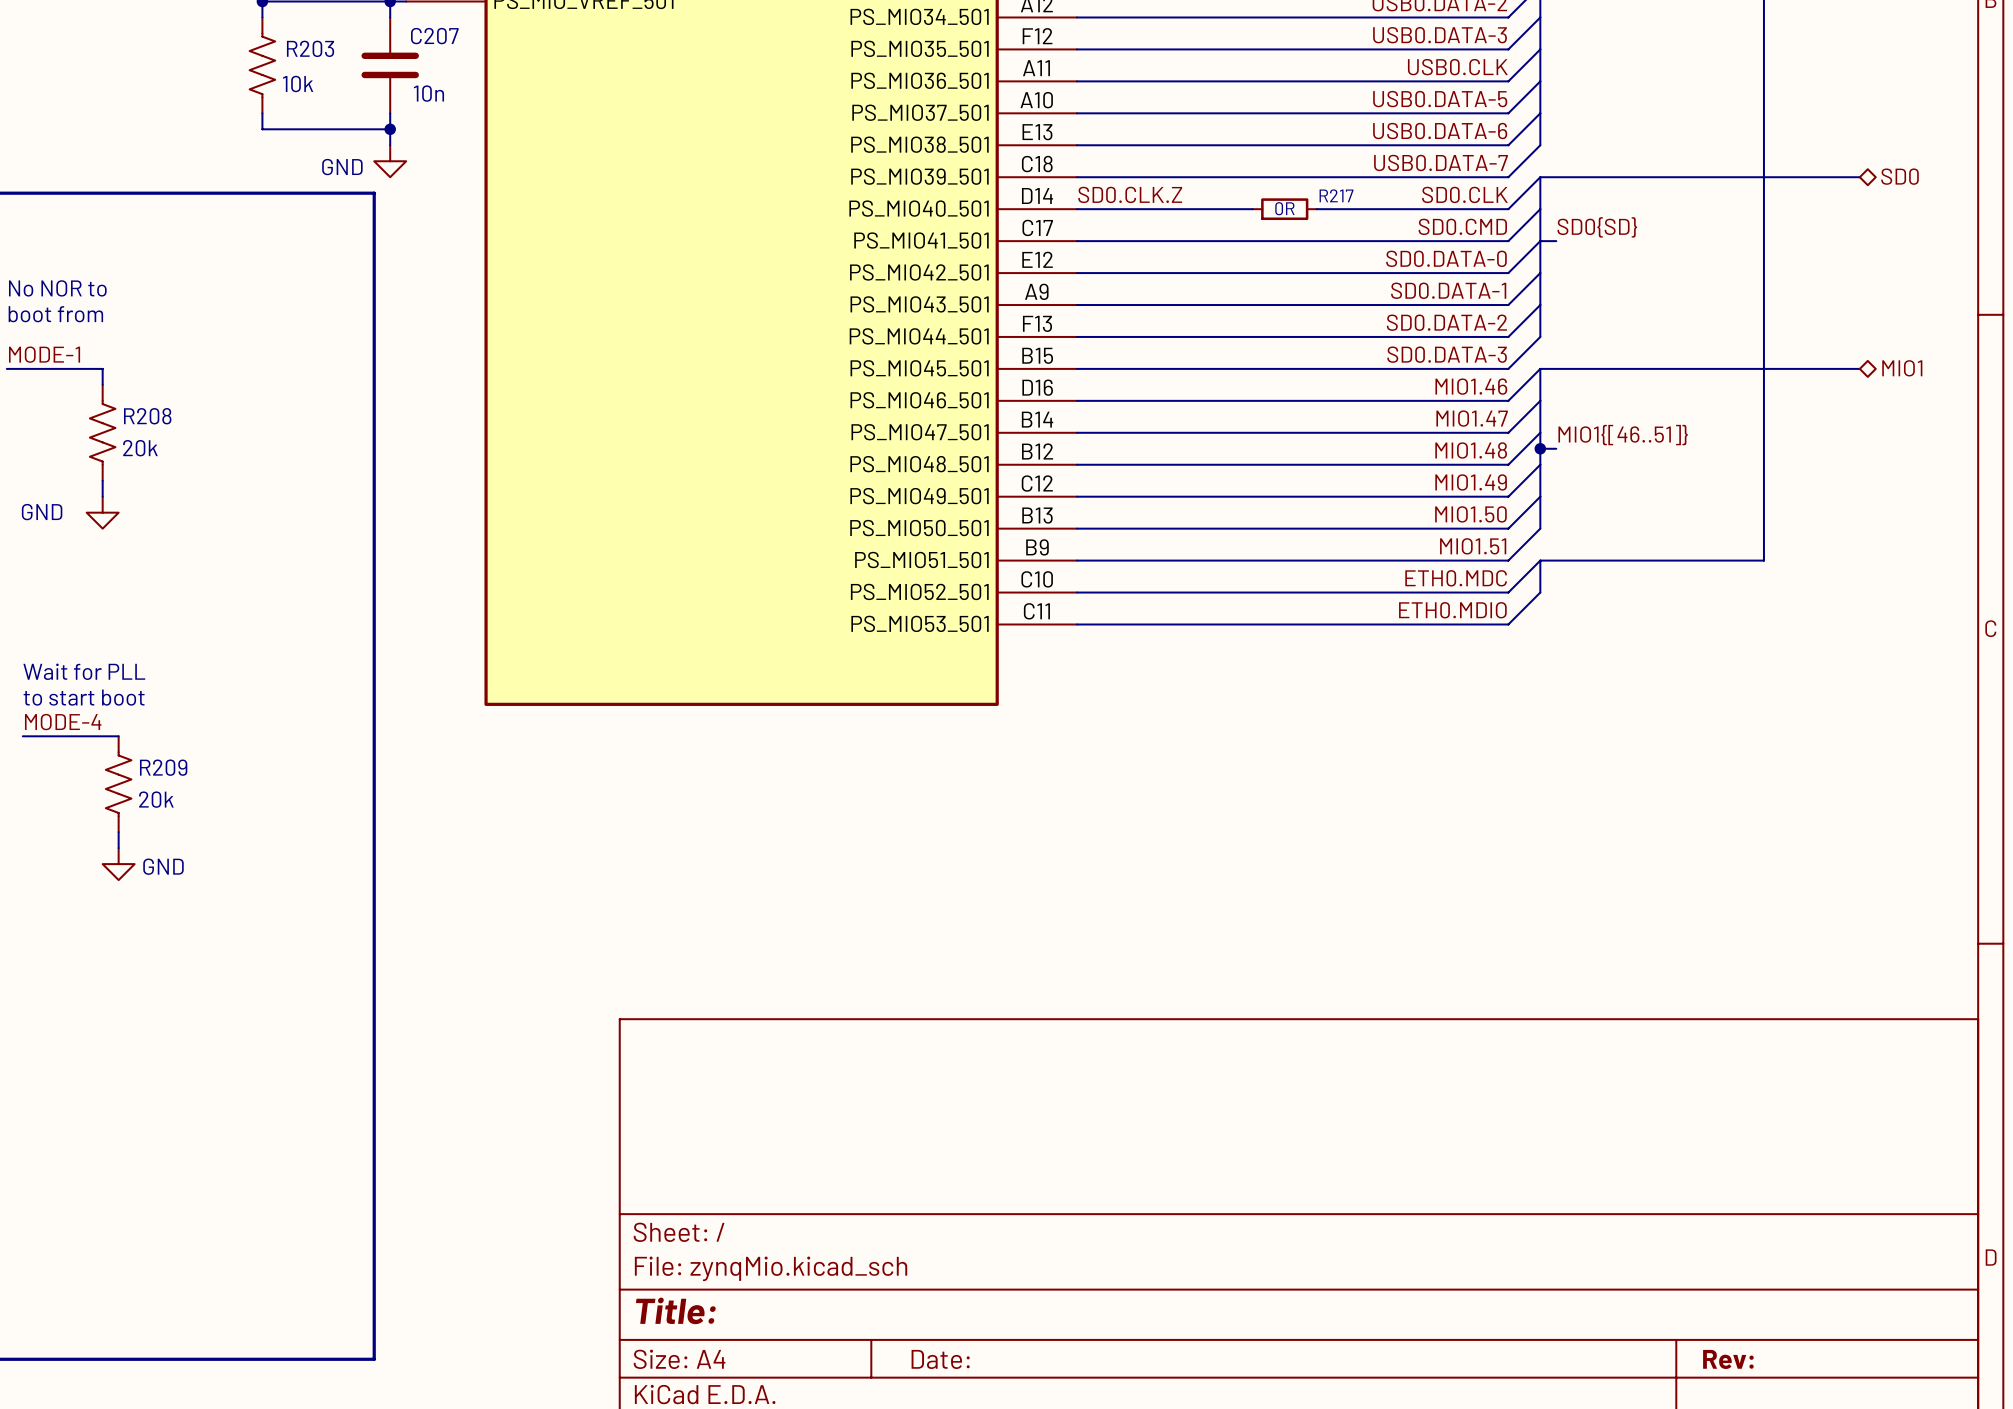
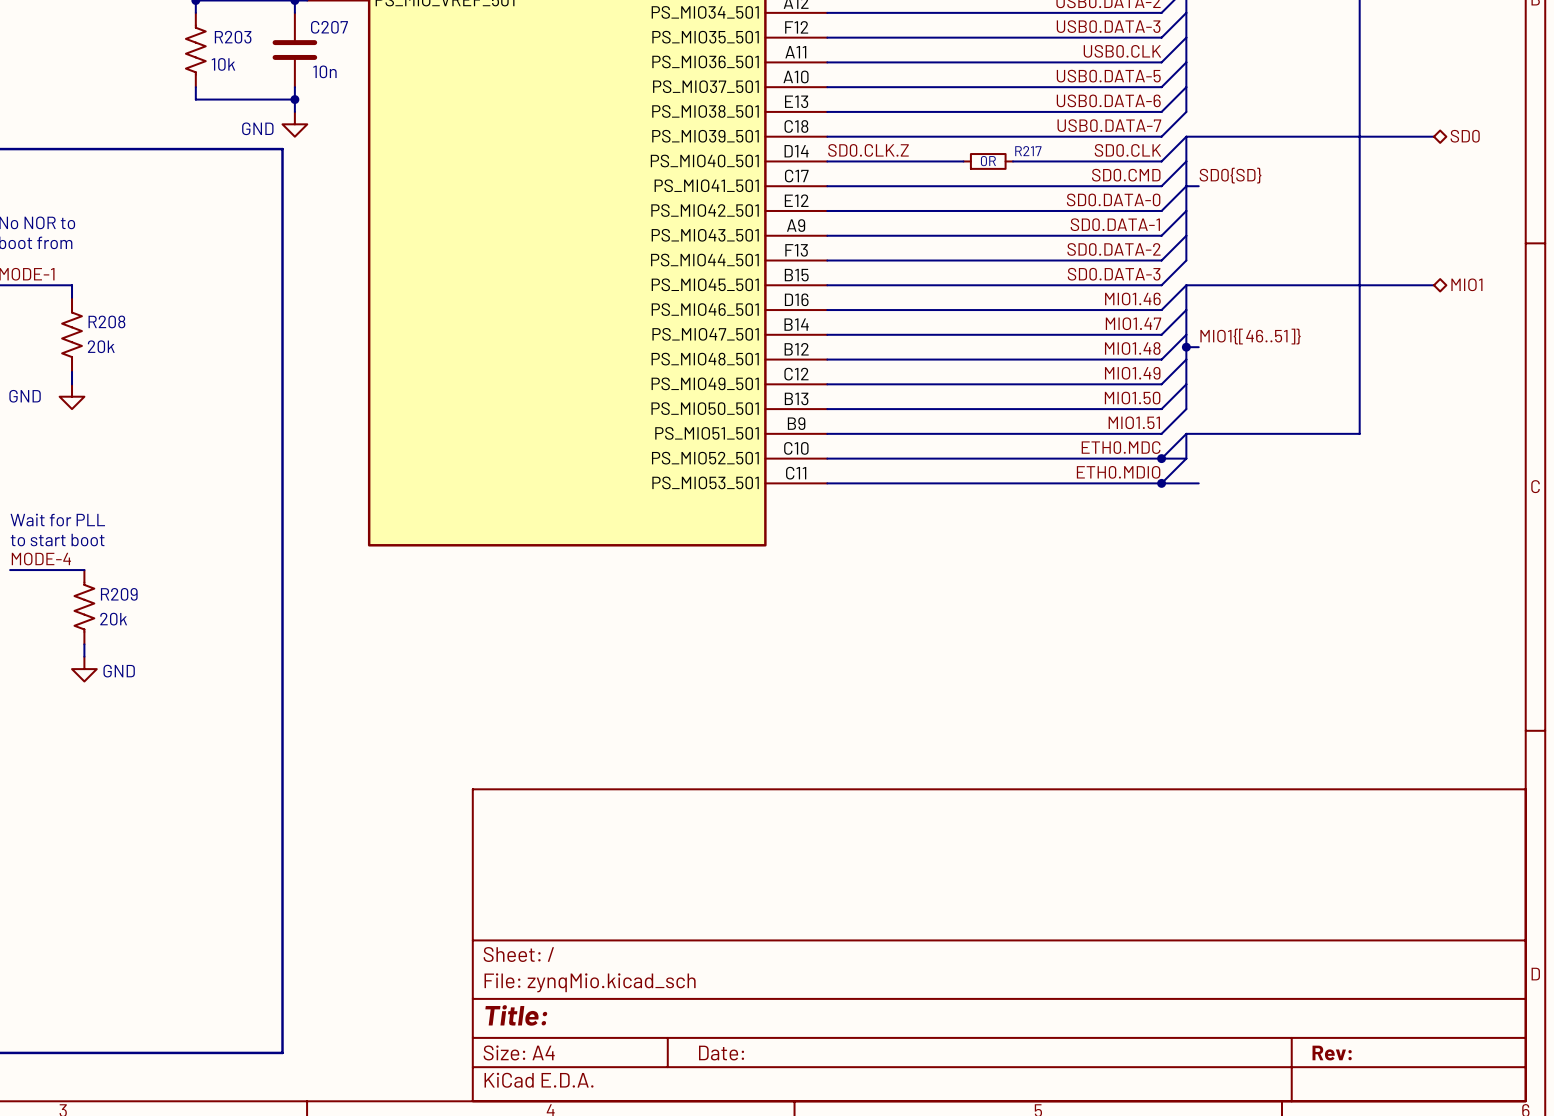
wire: none -> (1161, 458) (1186, 458)
junction: none -> (1161, 458)
wire: none -> (1161, 483) (1198, 483)
junction: none -> (1161, 483)

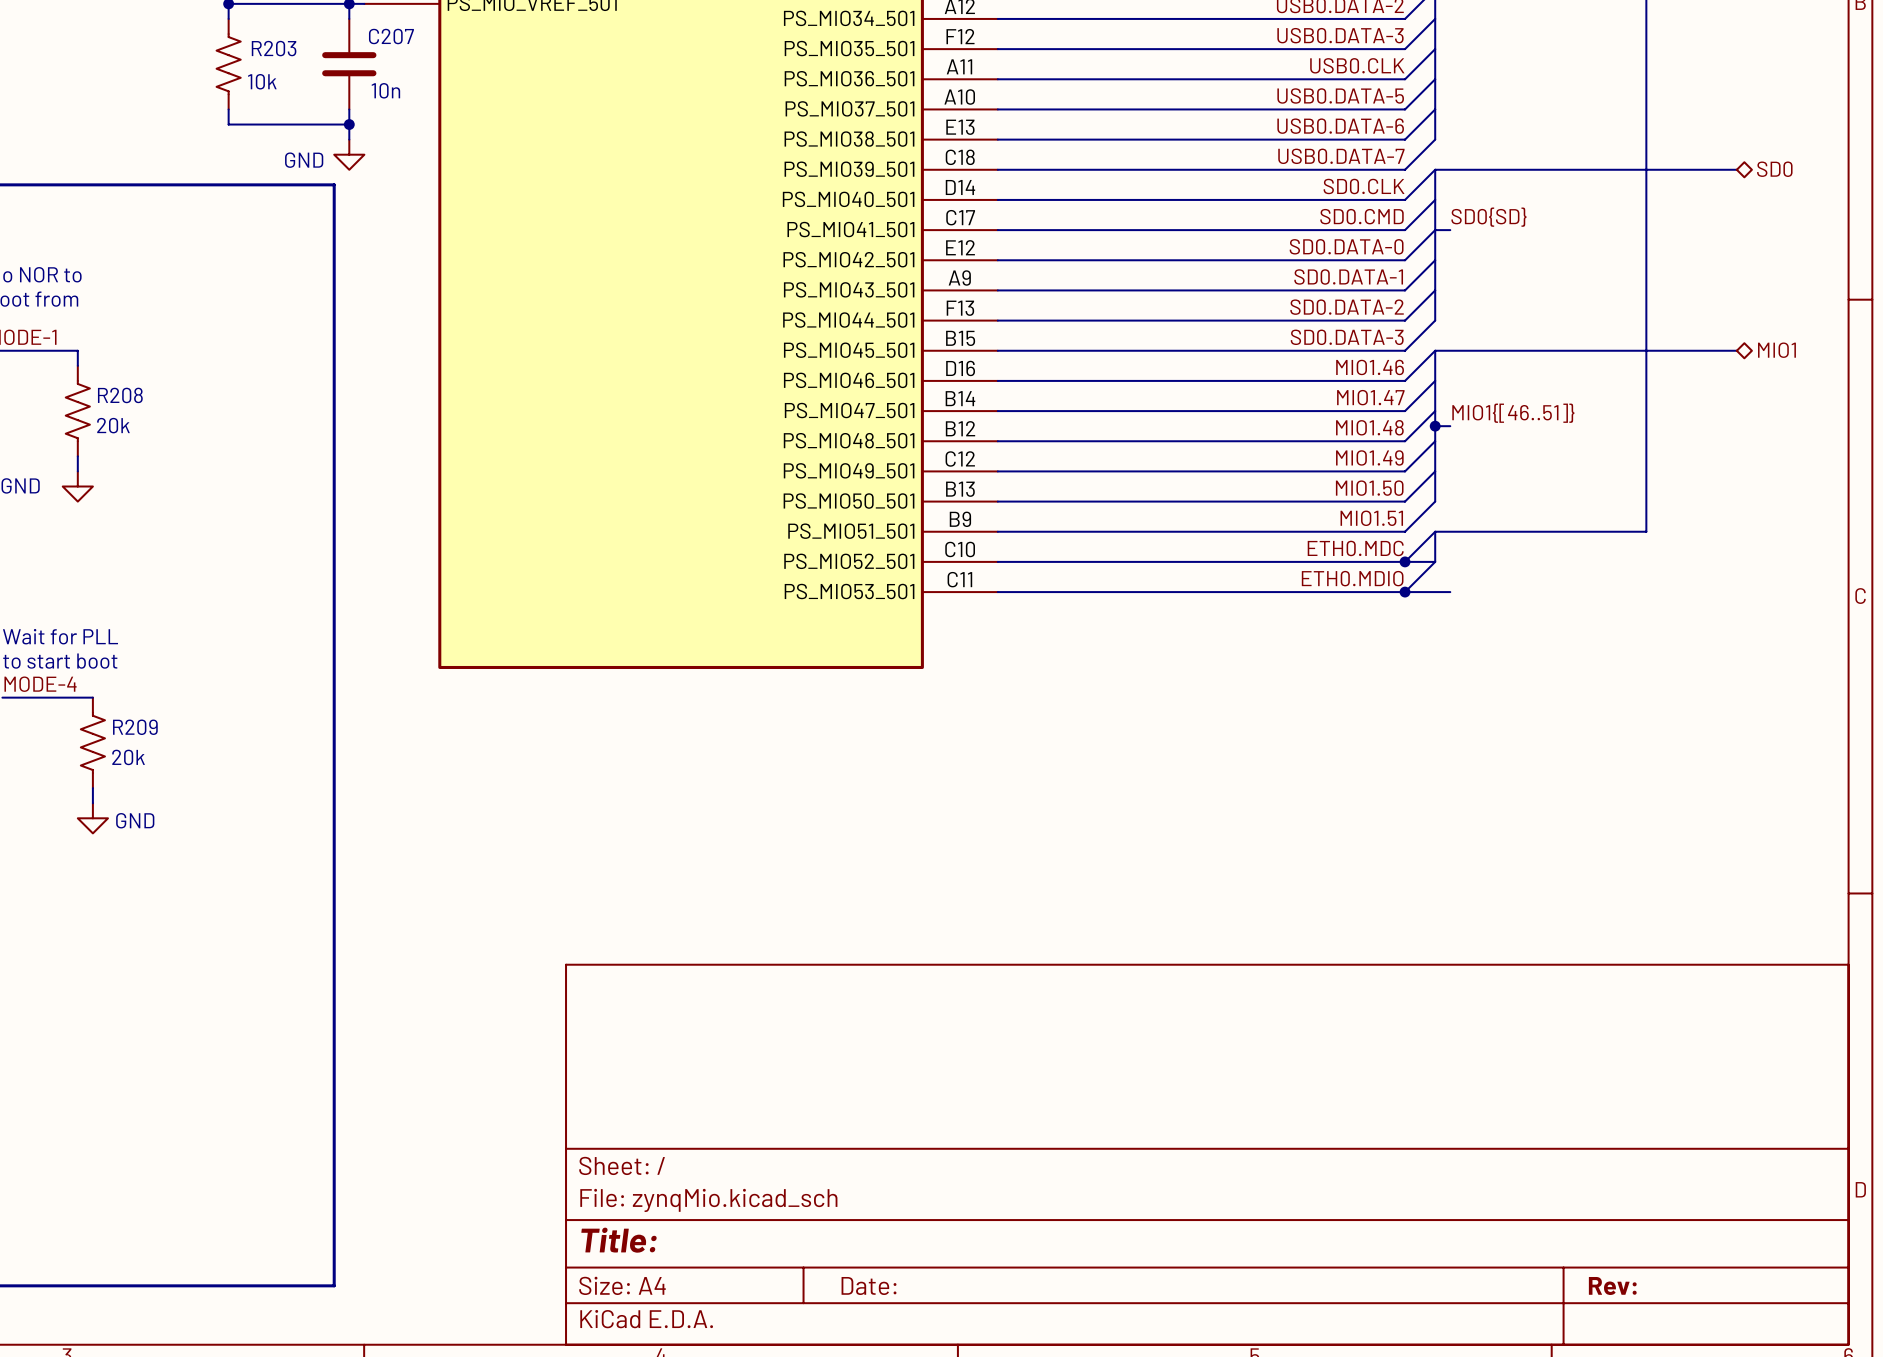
label: SD0.CLK.Z (868, 150) -> none
wire: none -> (1163, 199) (1224, 199)
R217: 0R (988, 161) -> none

